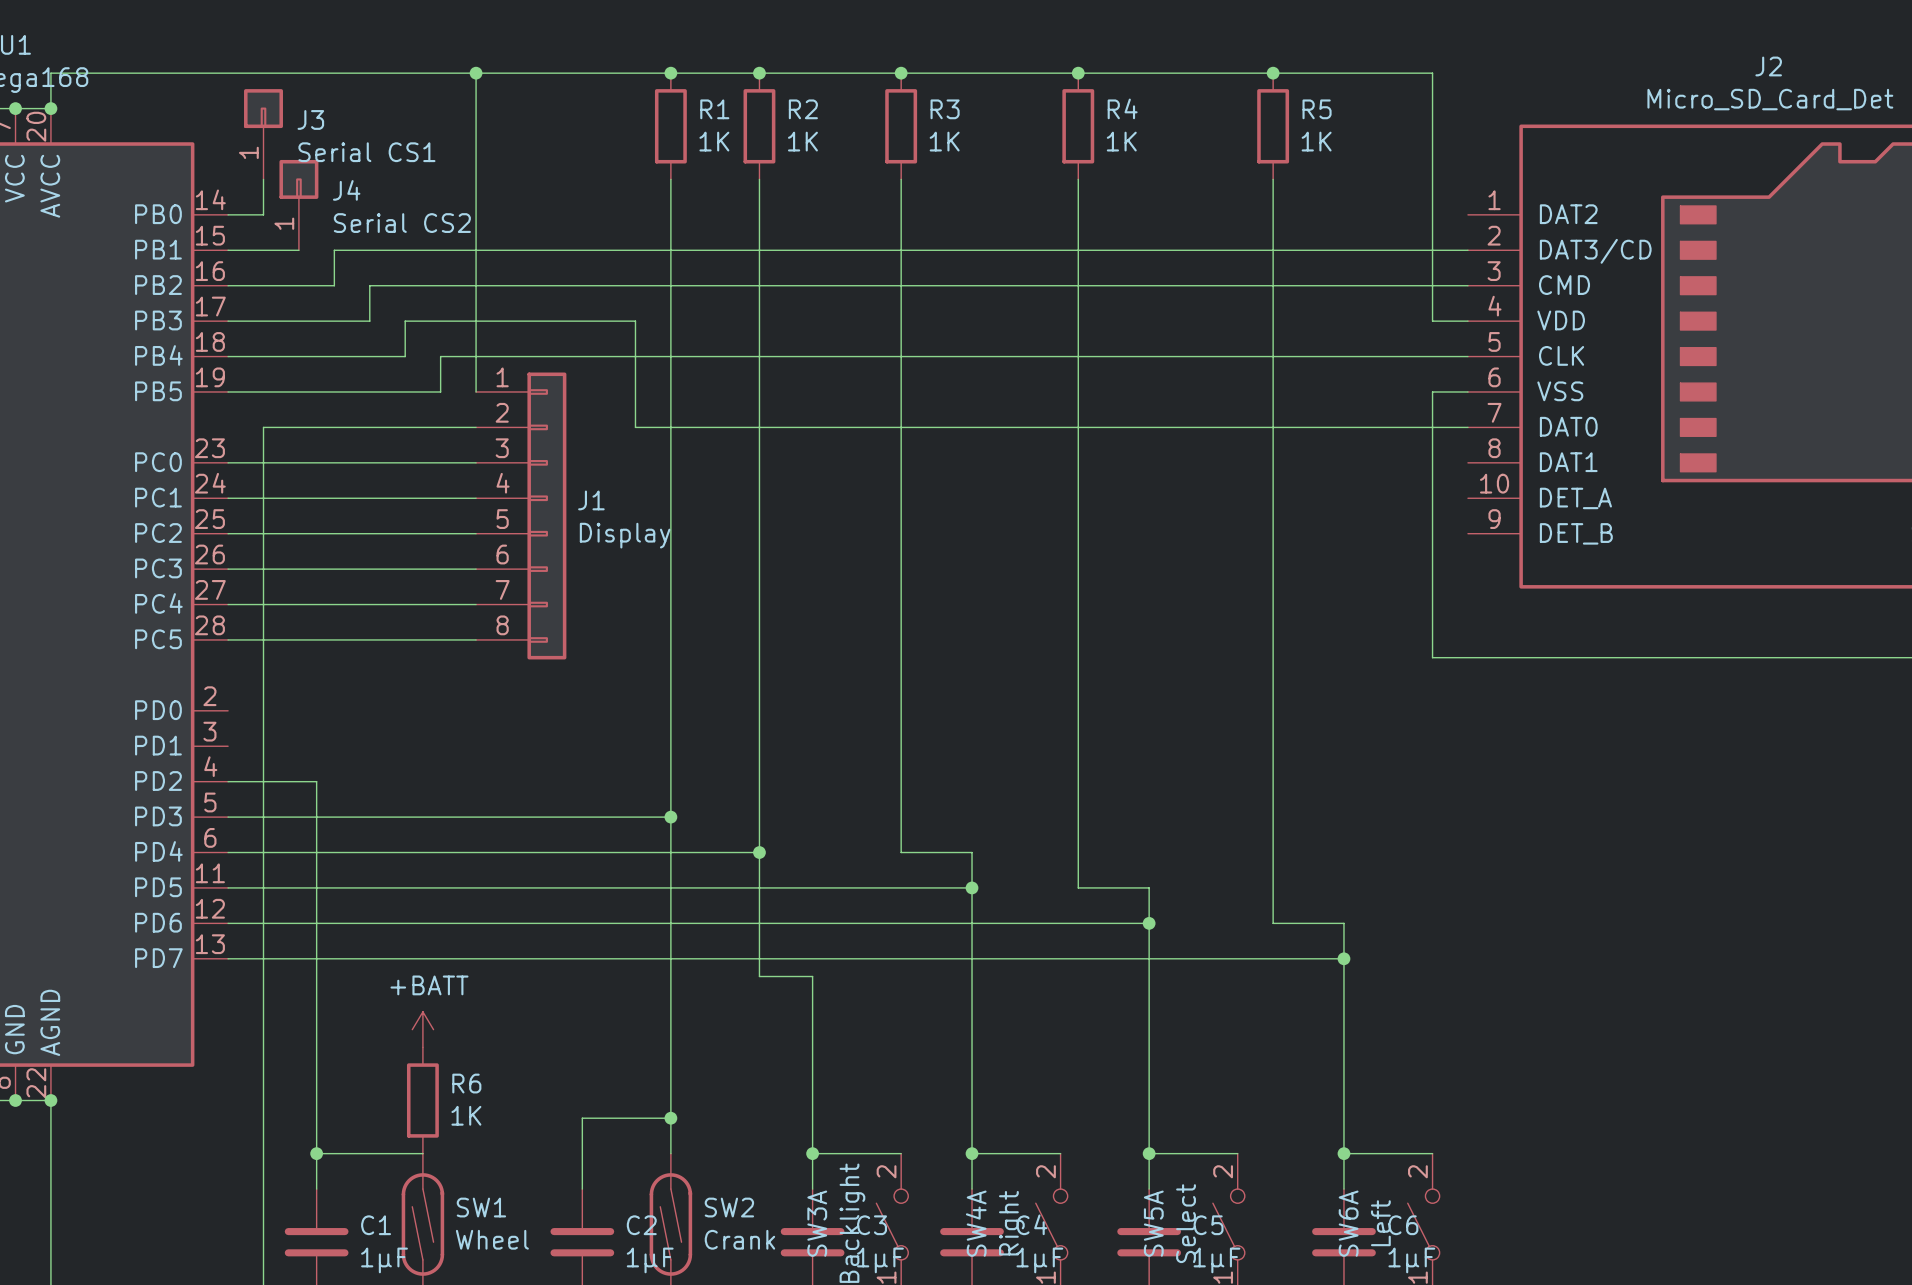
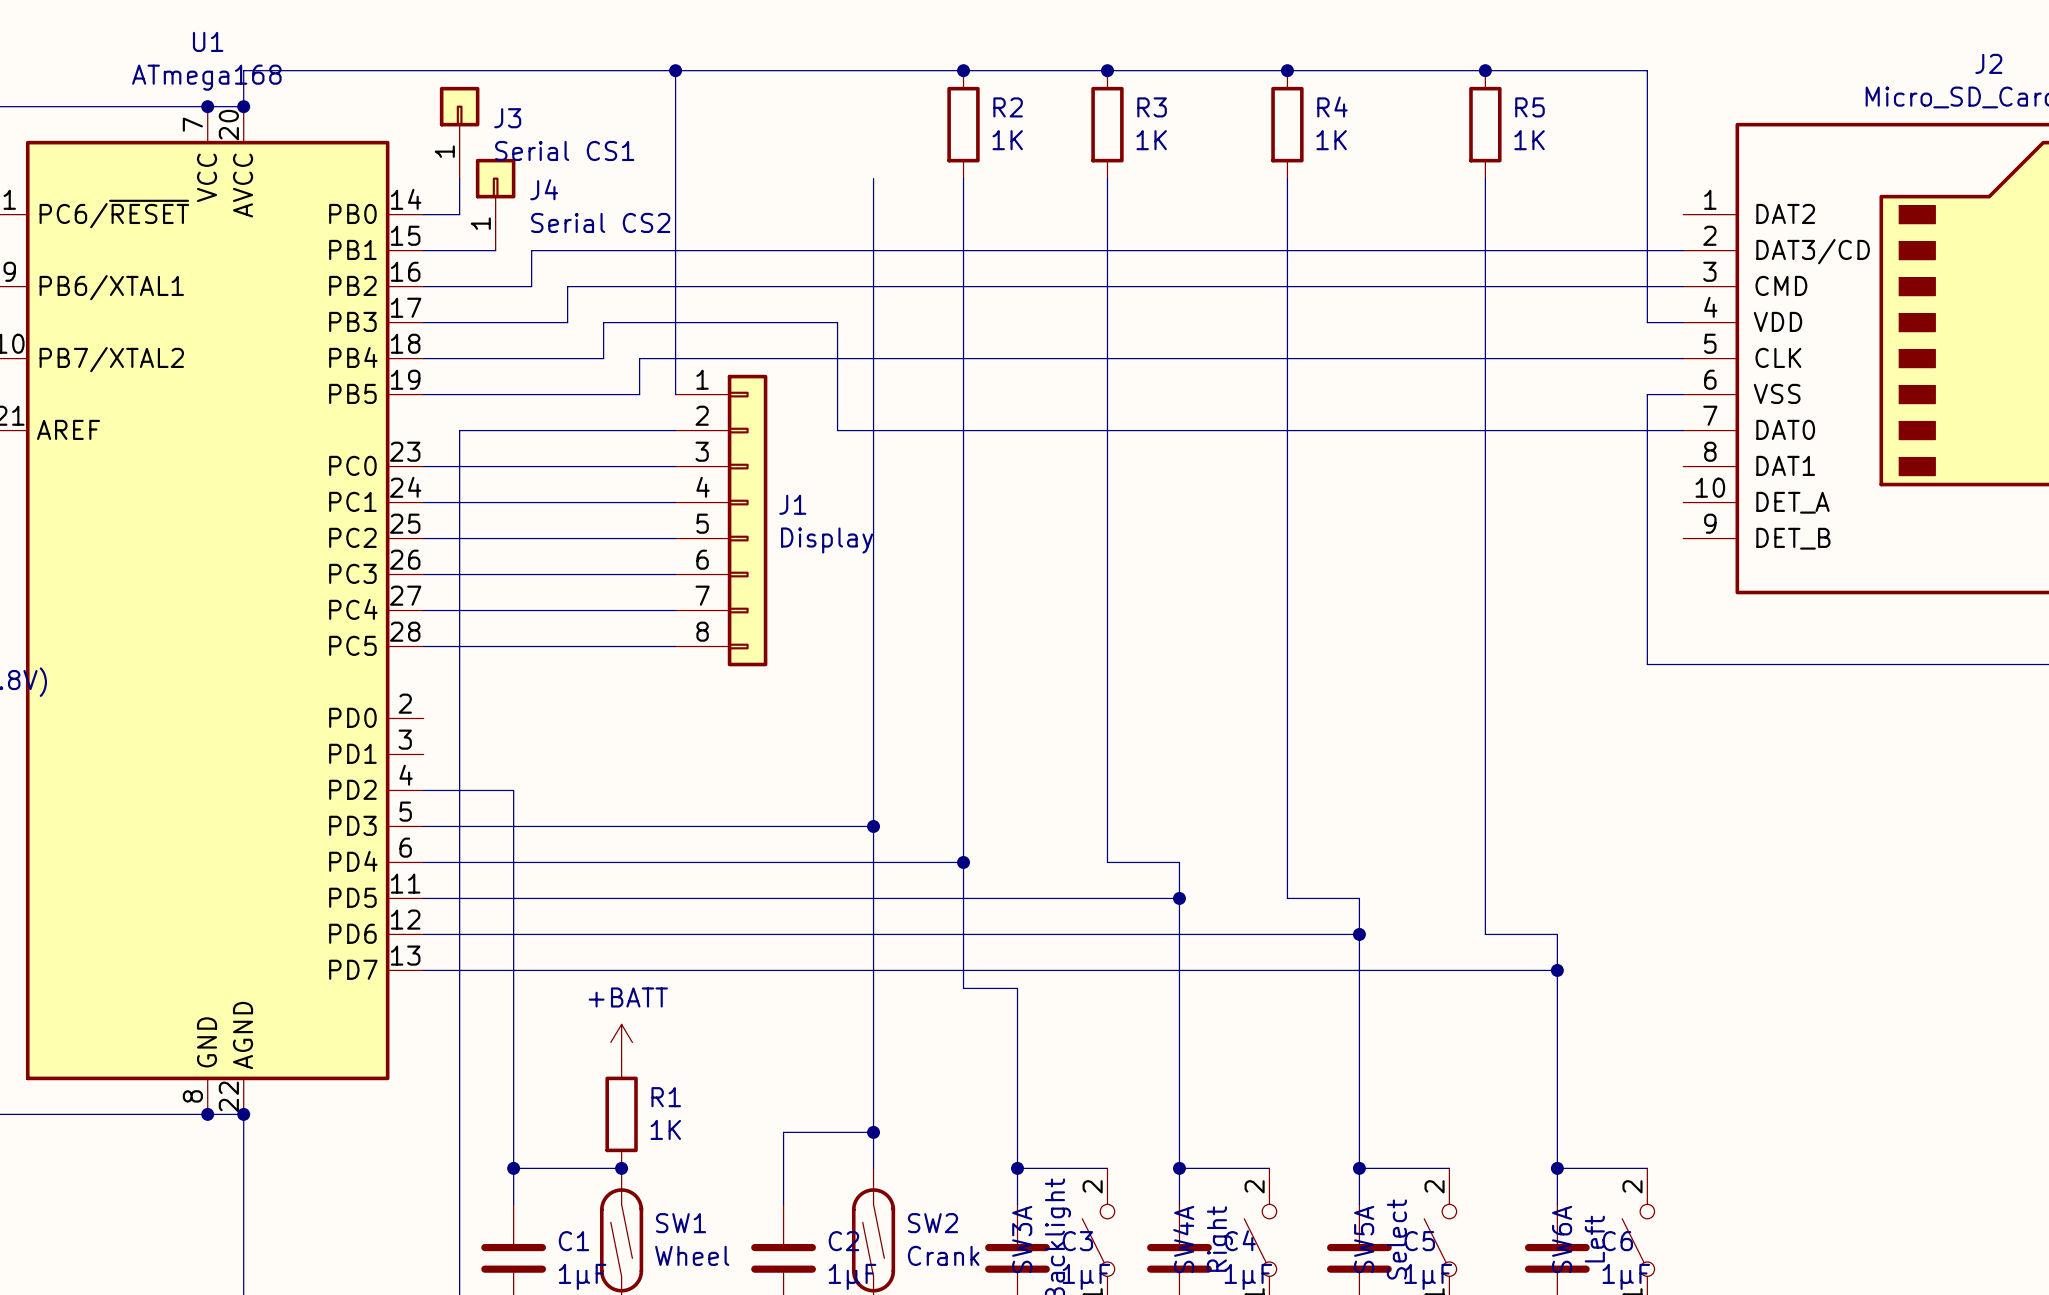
junction: (670, 73) -> none
R1: 1K (670, 126) -> none
R6 name: R6 (466, 1083) -> R1 (666, 1097)
junction: none -> (621, 1168)

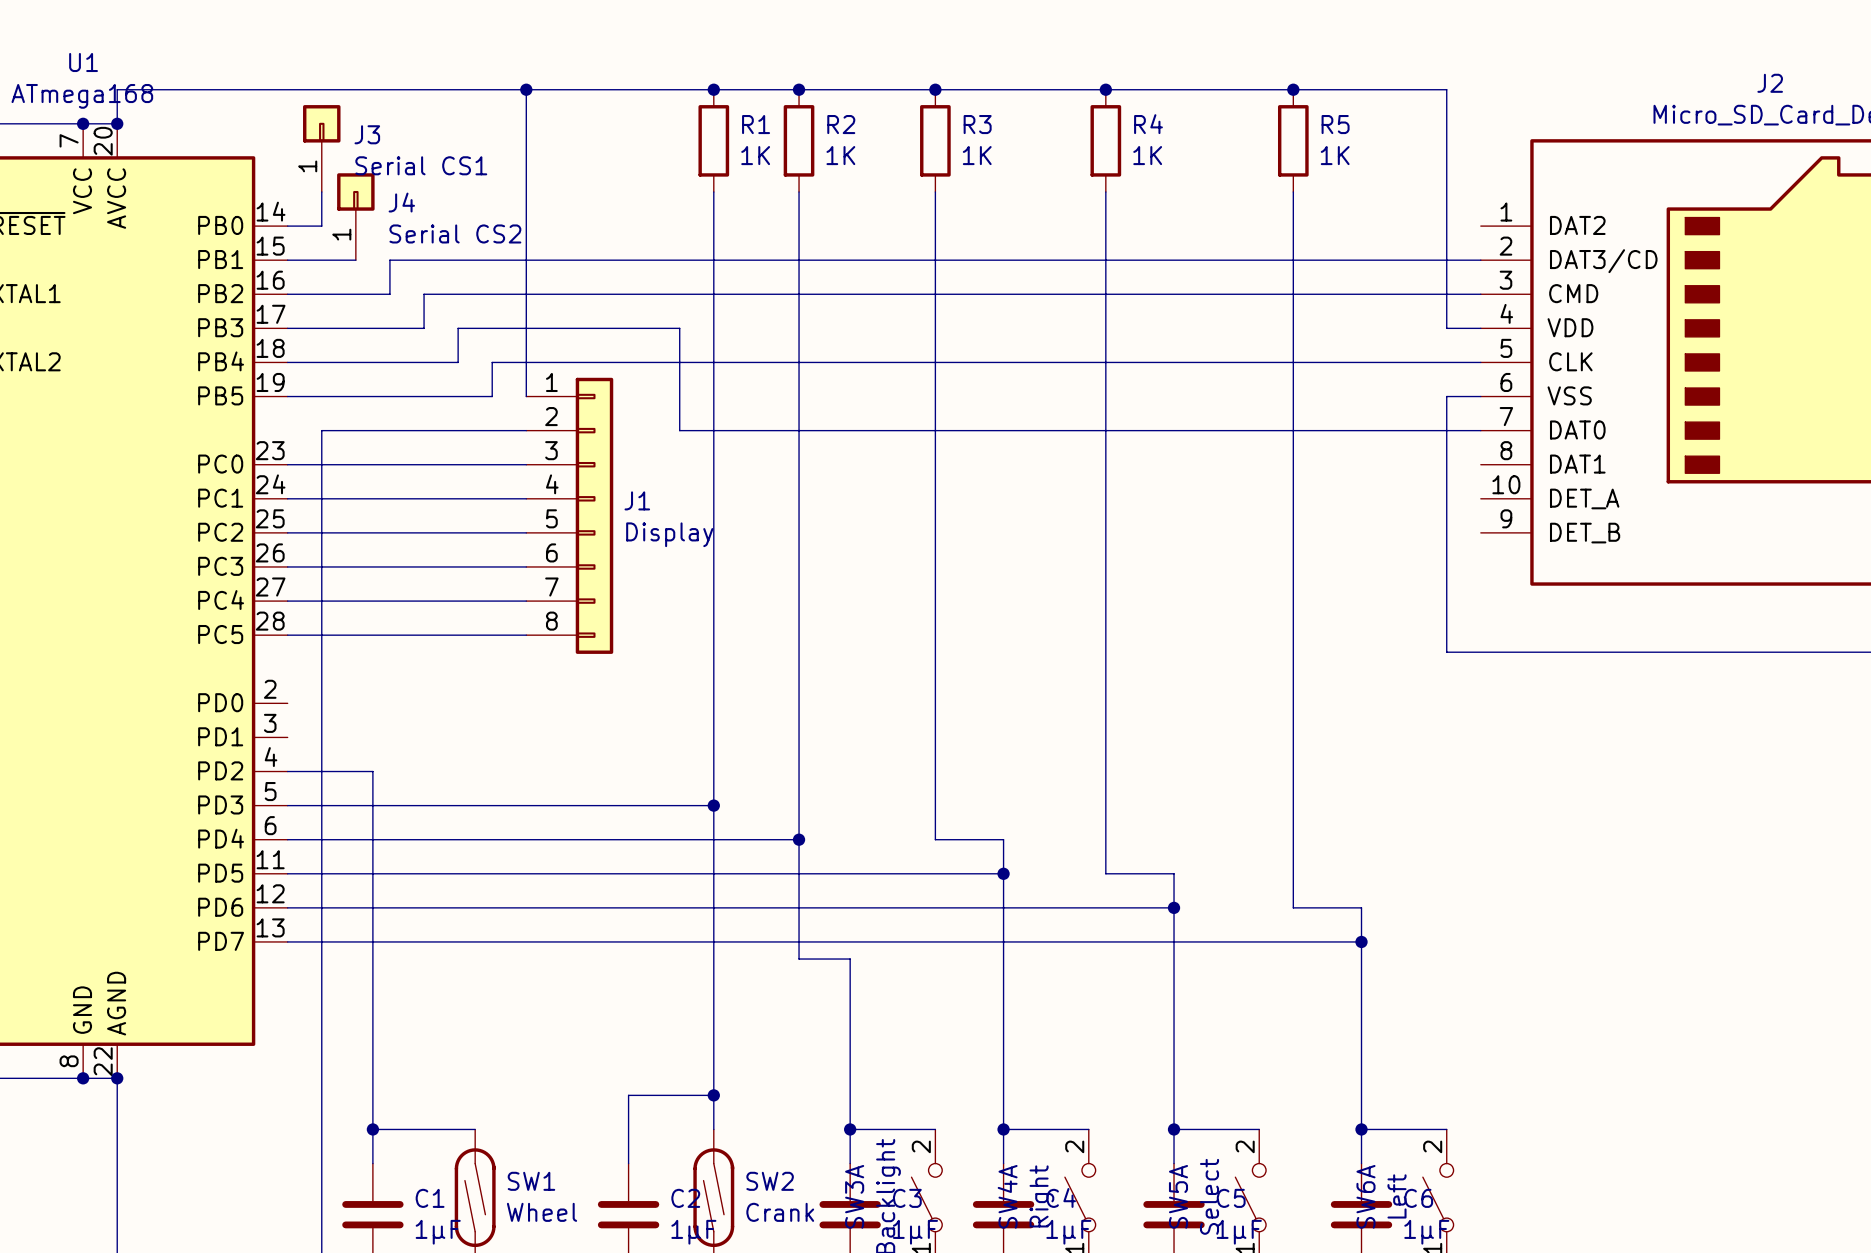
junction: none -> (713, 89)
power symbol: +BATT (621, 1042) -> none
R1 position: (621, 1114) -> (713, 140)
junction: (621, 1168) -> none

